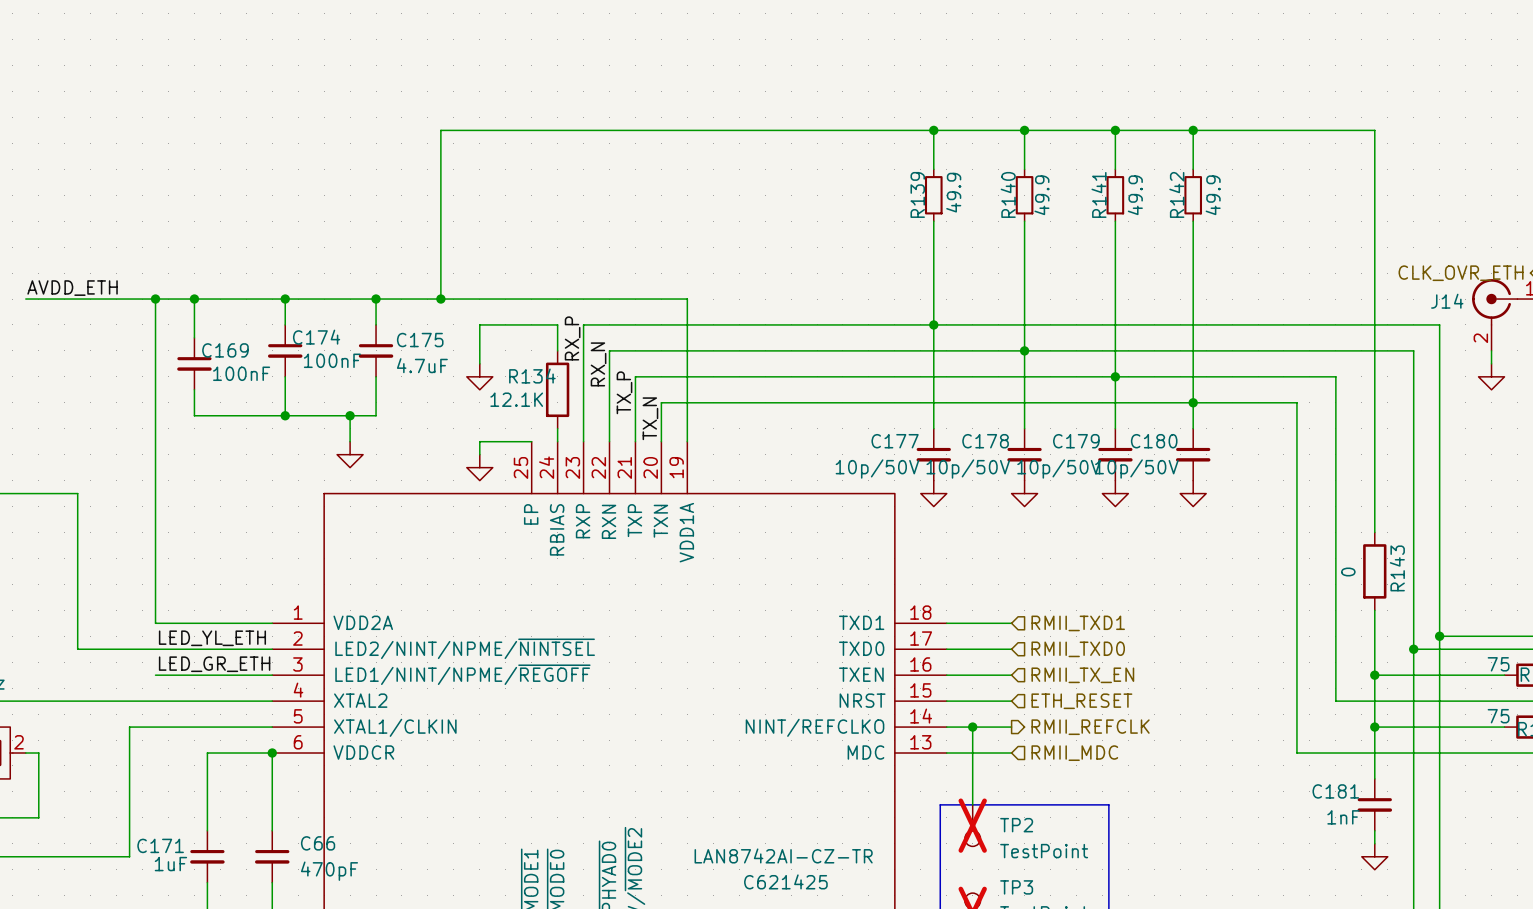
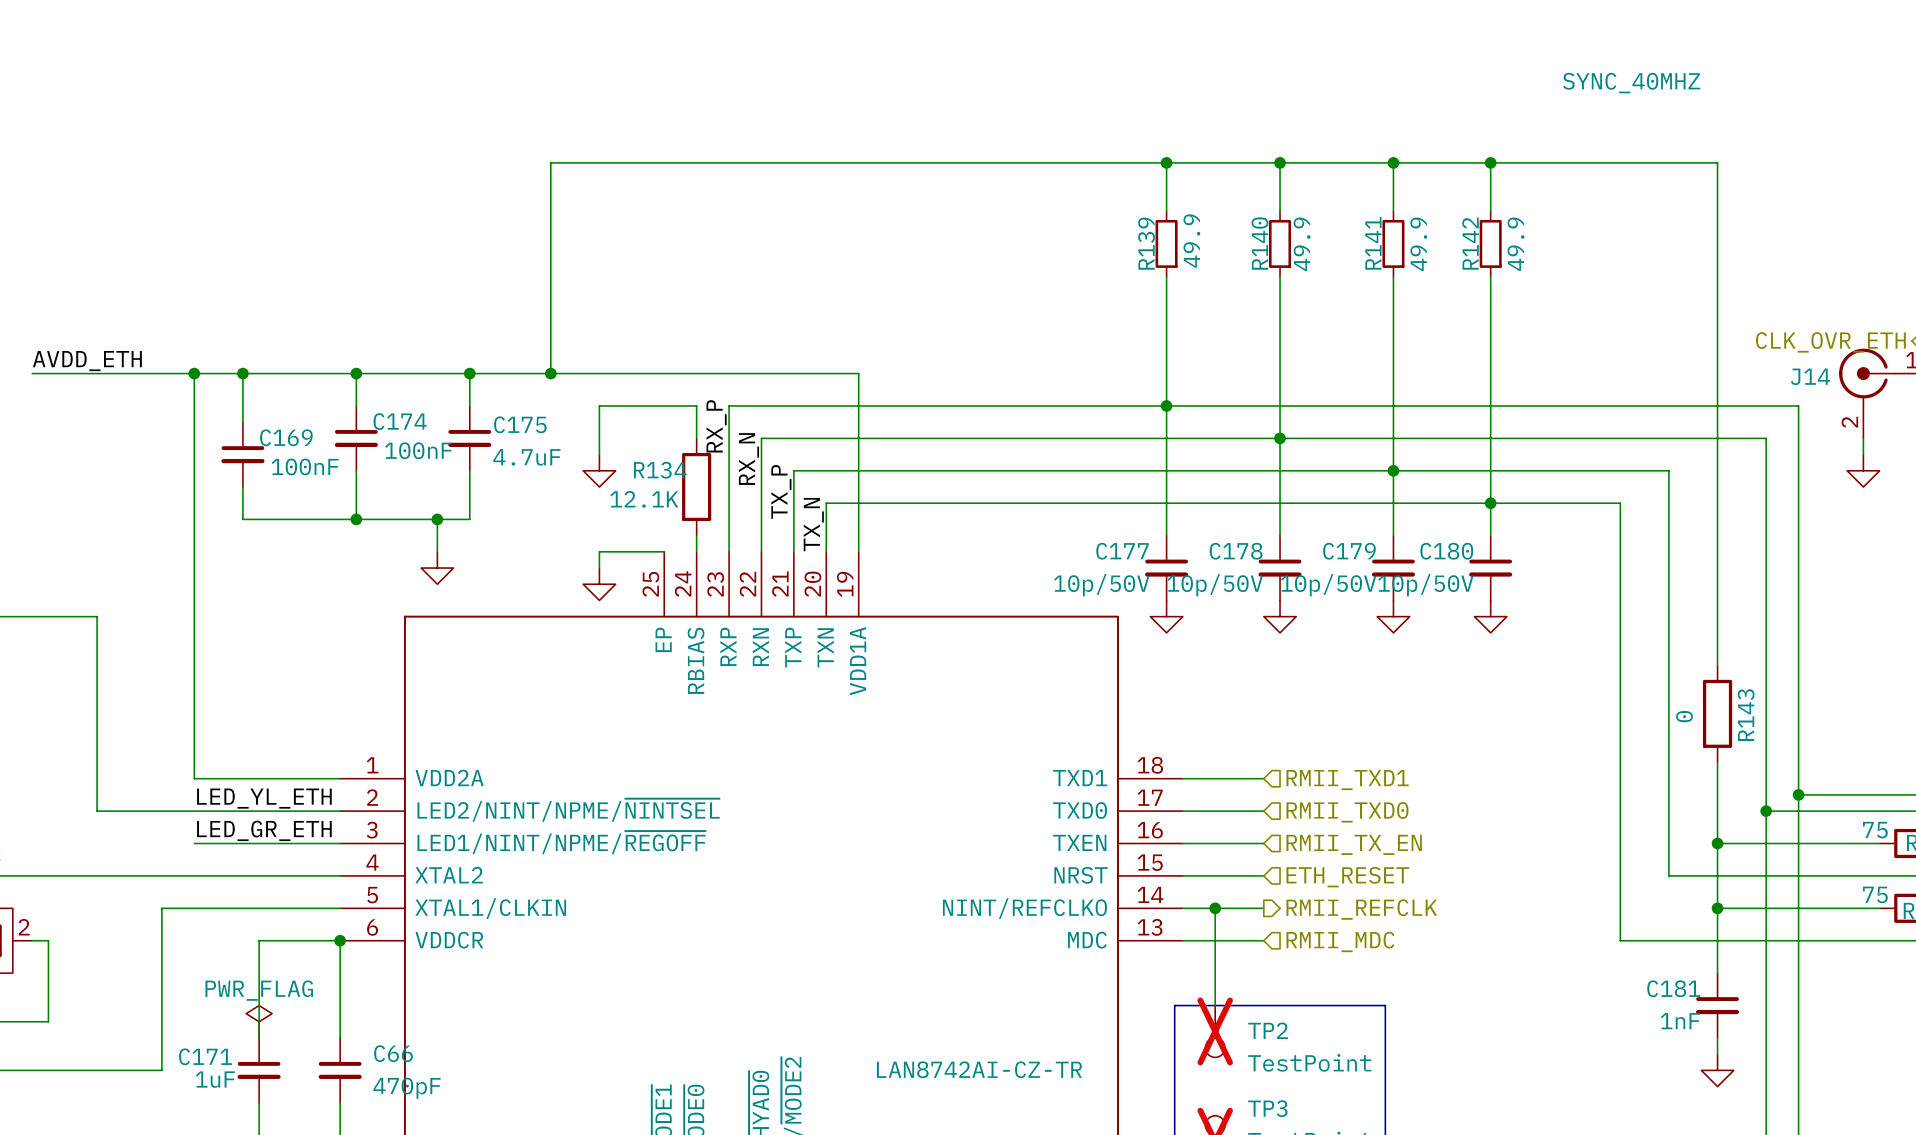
J14 value: none -> SYNC_40MHZ (1631, 83)
power symbol: none -> PWR_FLAG (259, 1021)
part text: C621425 (785, 881) -> none

